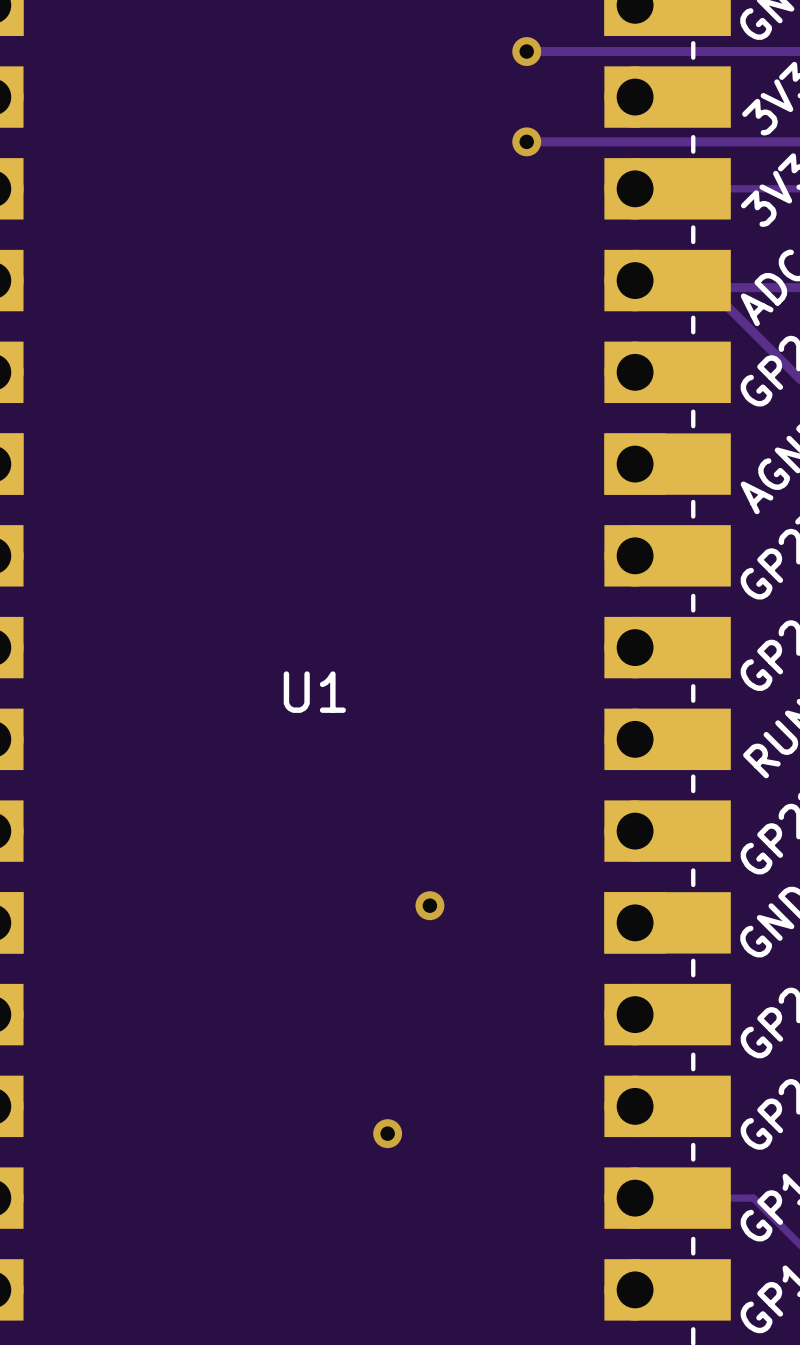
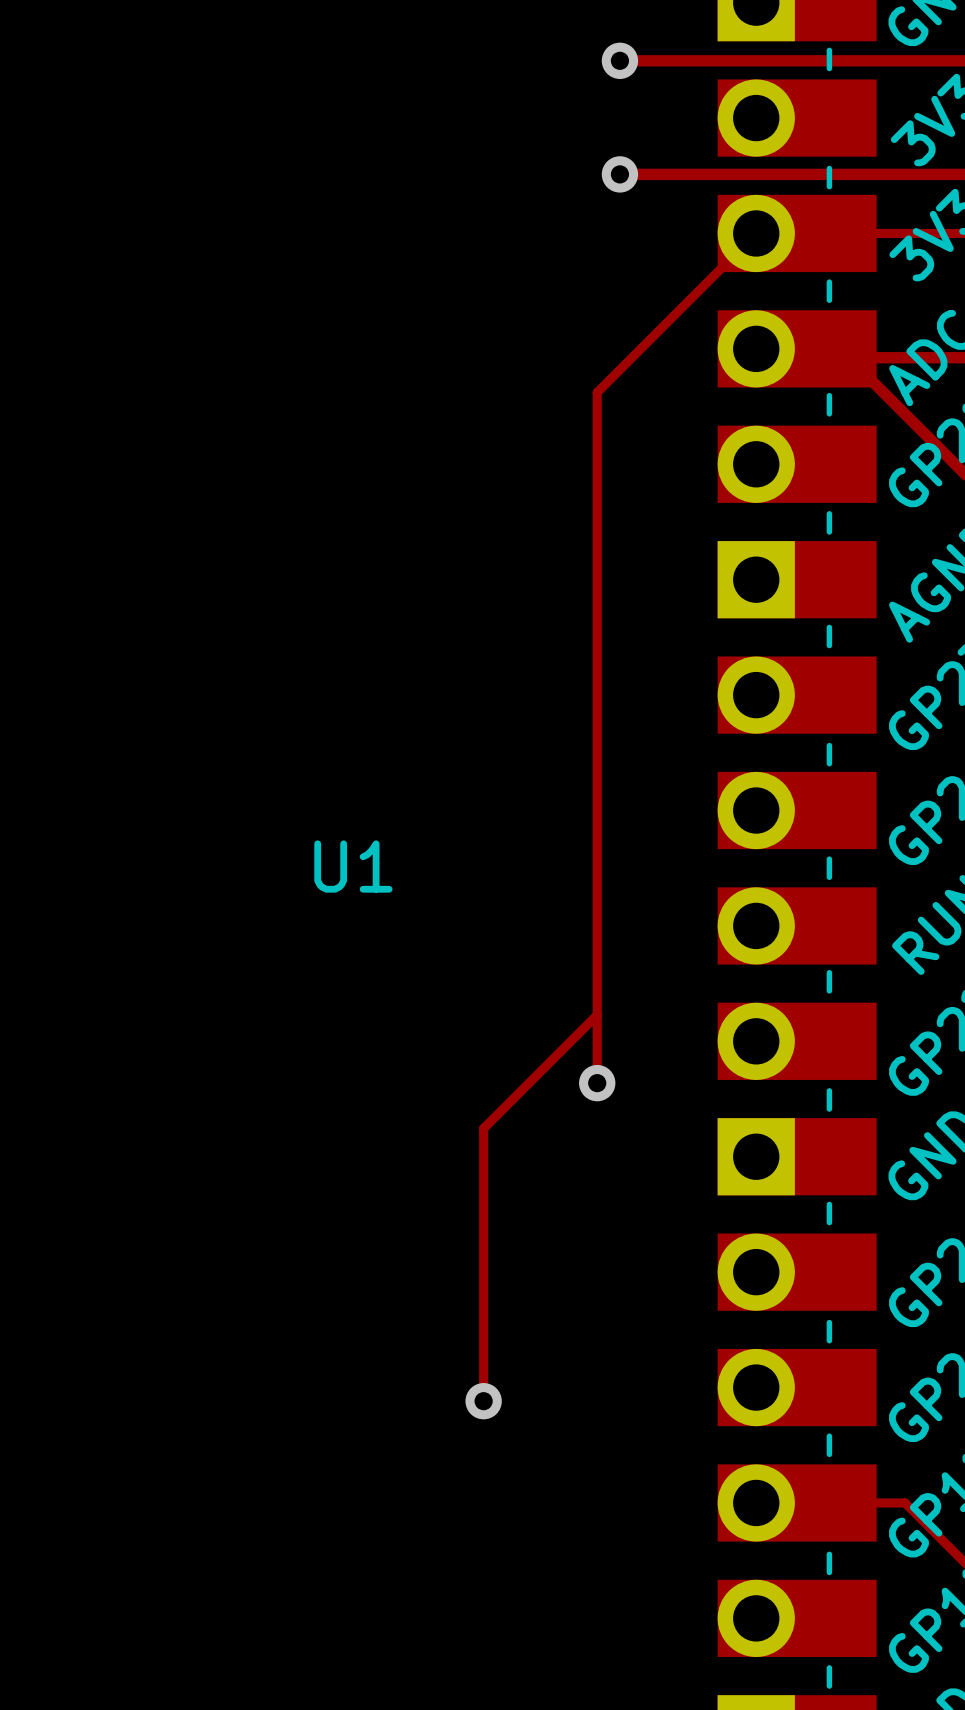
track: none -> (756, 233) (597, 392) (597, 1083)
track: none -> (597, 1014) (483, 1128) (483, 1401)
via position: (429, 905) -> (597, 1083)
via position: (387, 1133) -> (483, 1401)

